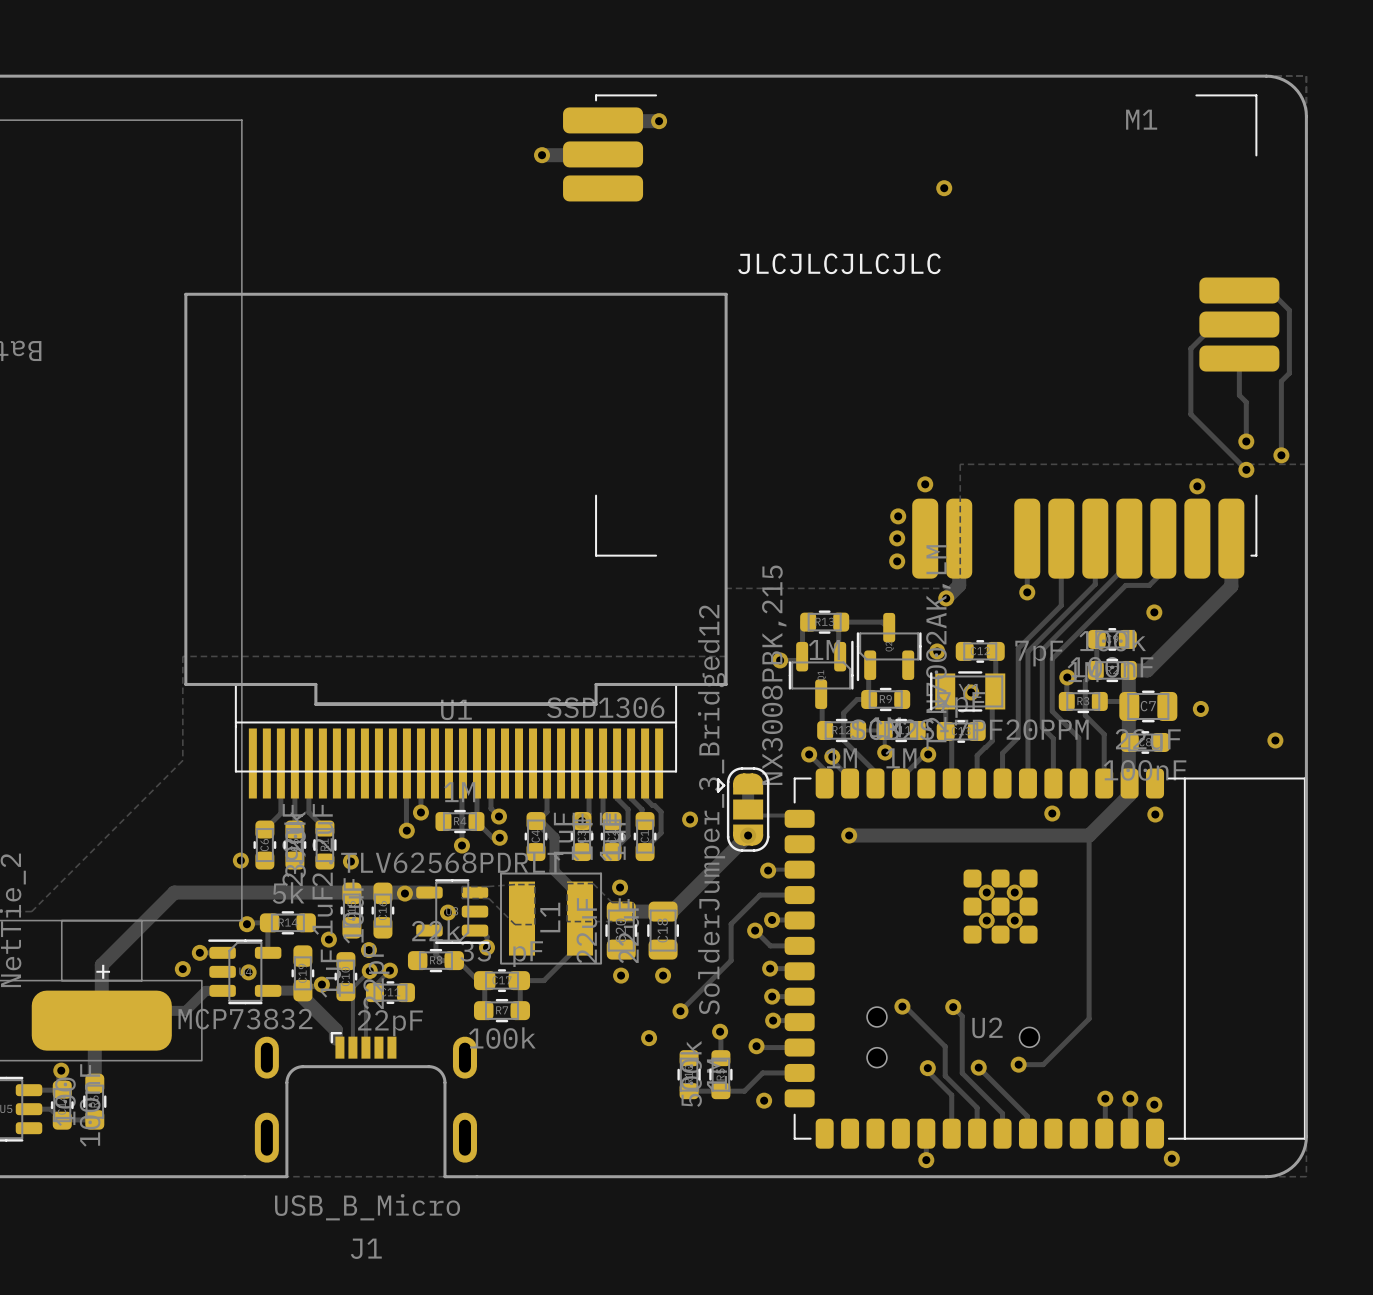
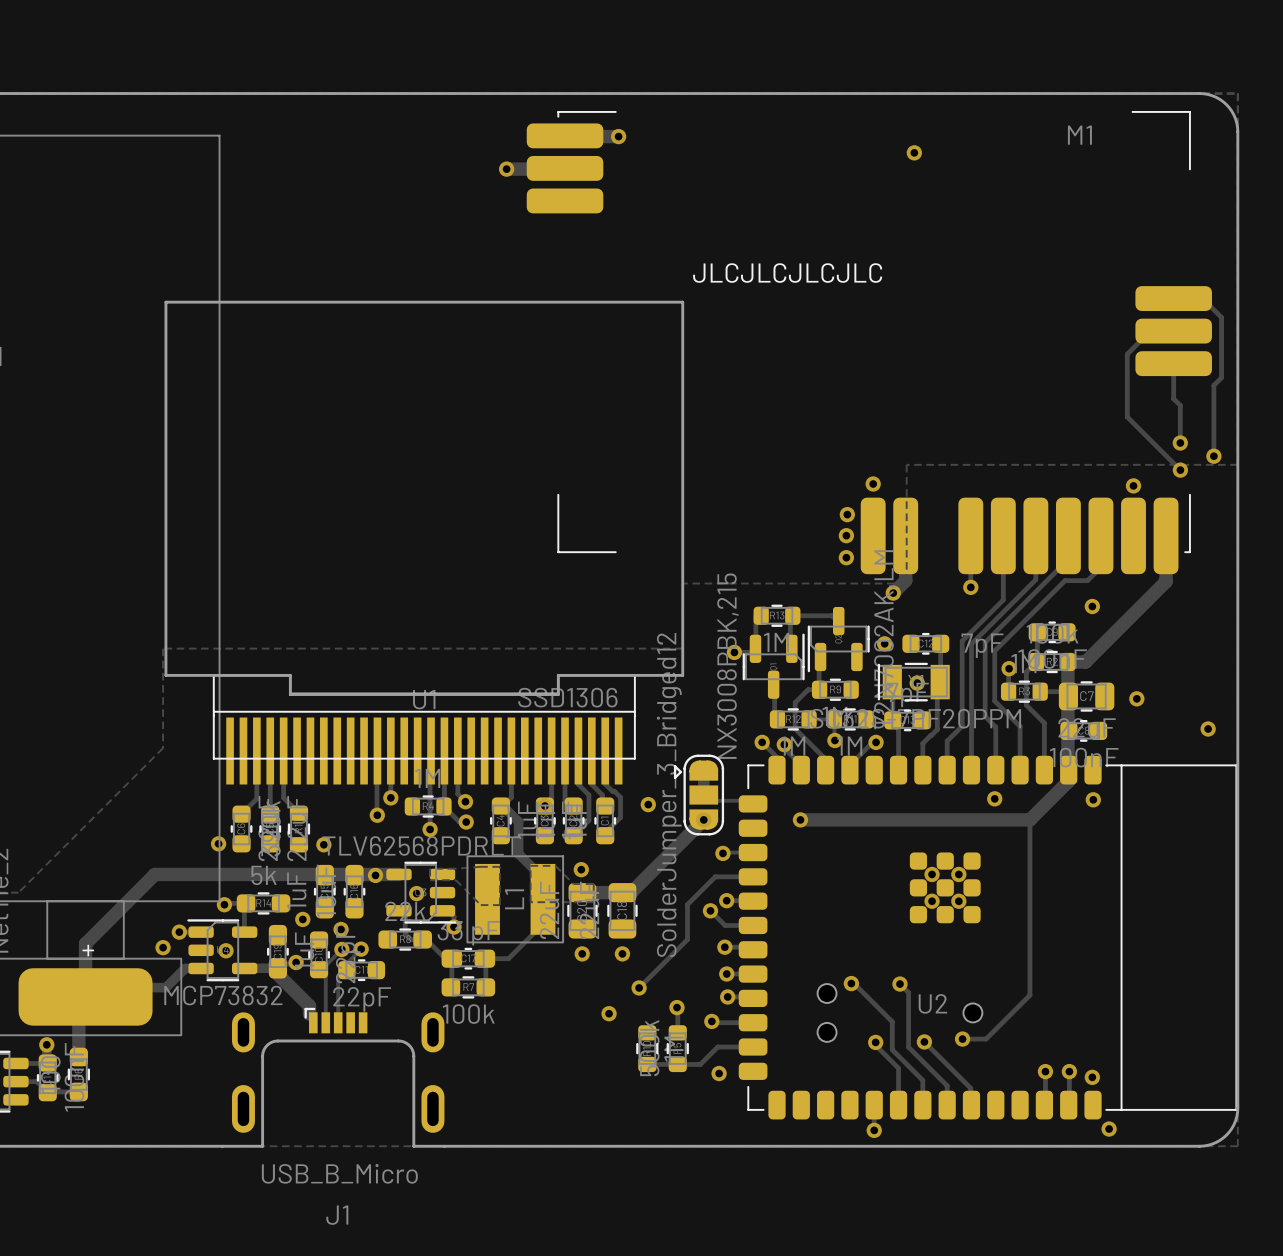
via position: (944, 188) -> (914, 152)

